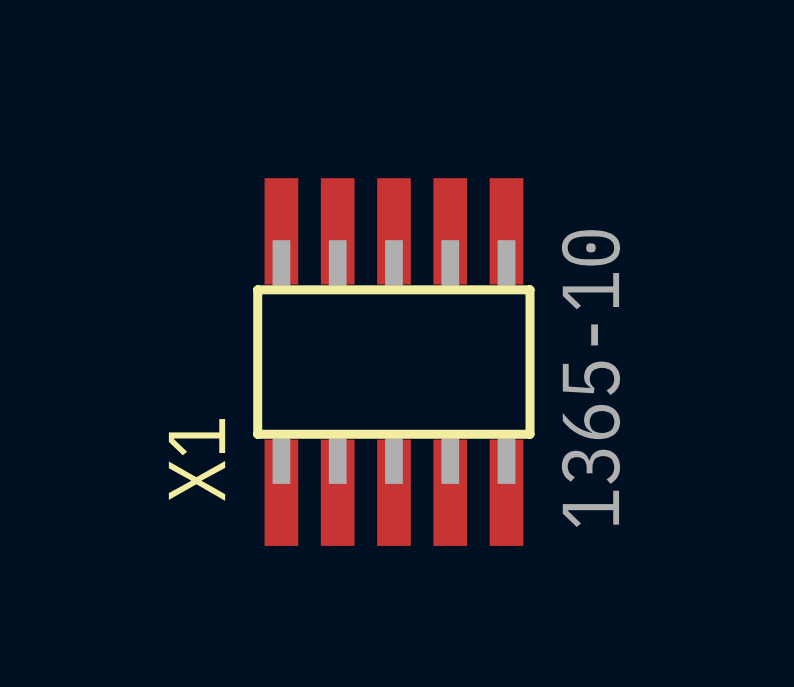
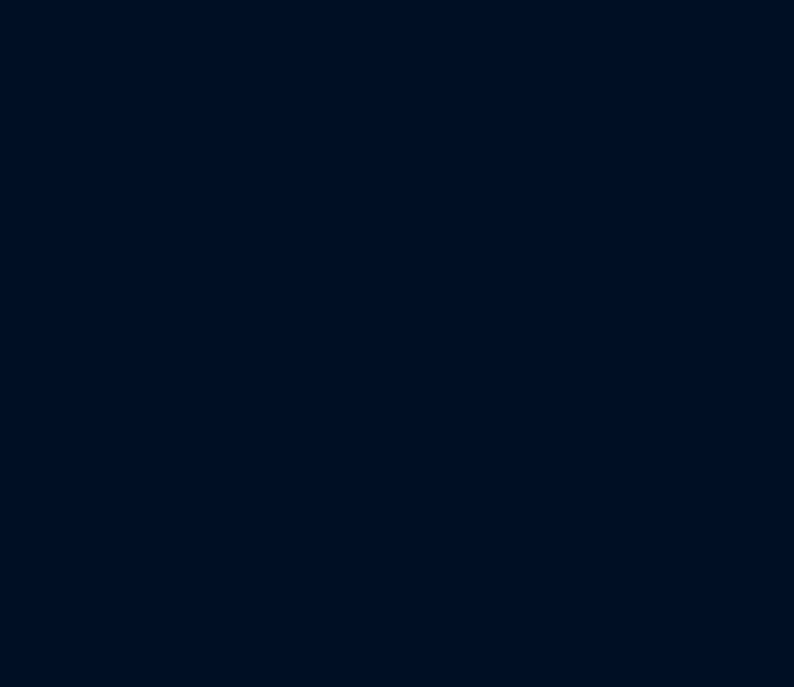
X1: 1365-10 (393, 362) -> none

